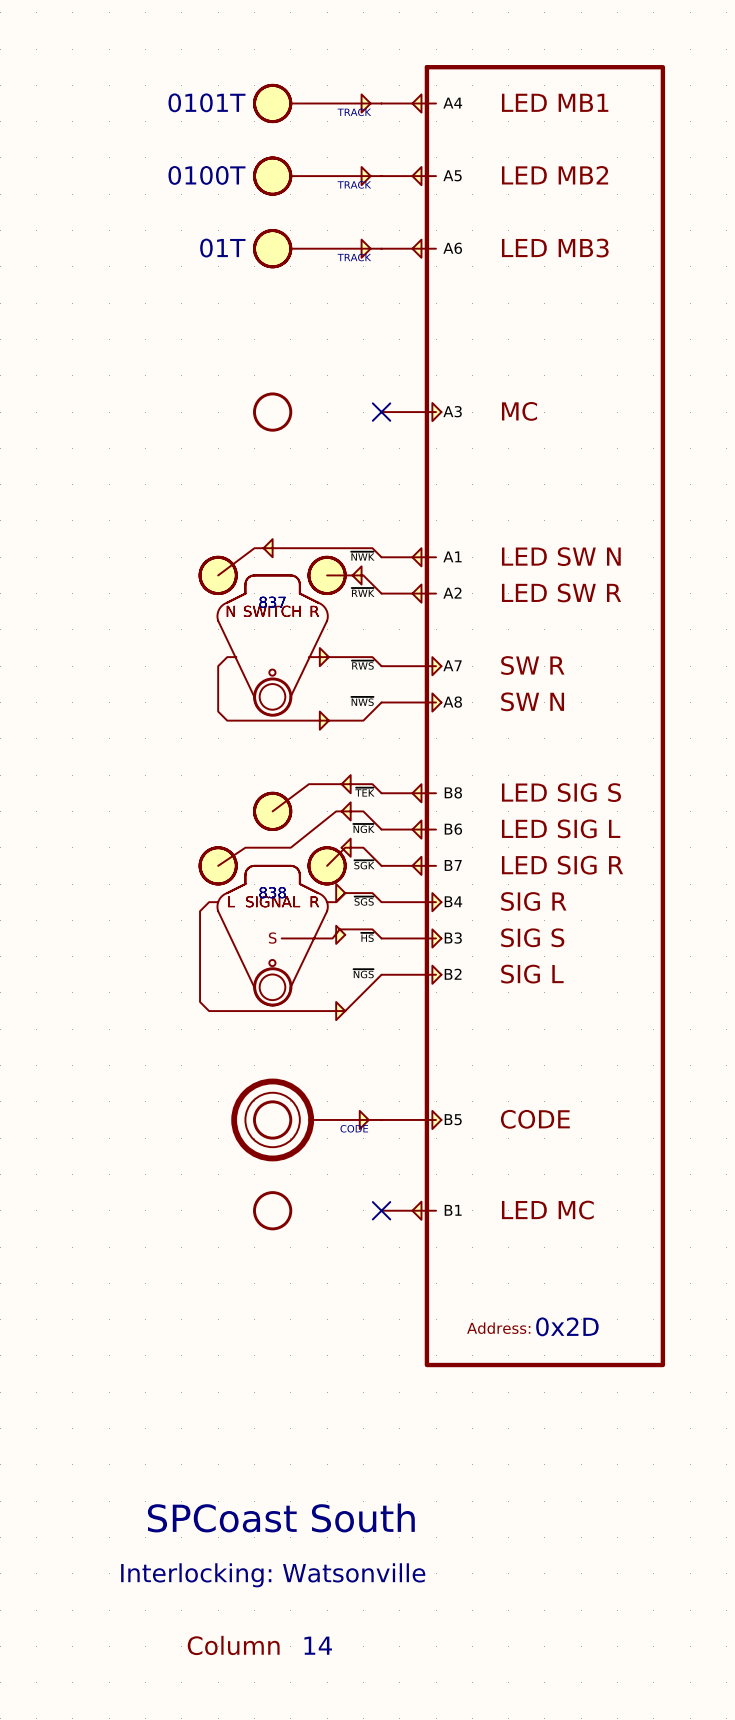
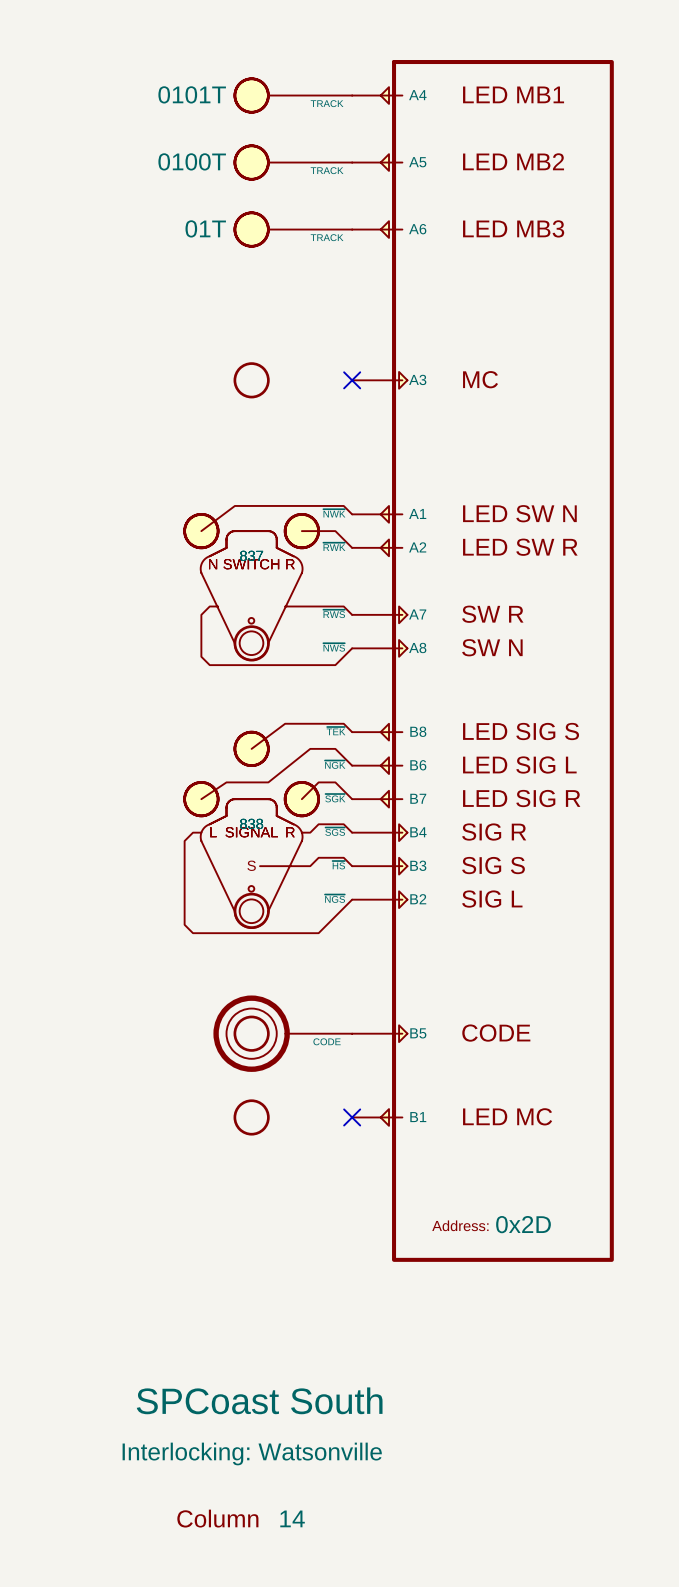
part symbol: [253, 83, 382, 124] -> [233, 77, 353, 114]
part symbol: [253, 156, 382, 196] -> [233, 144, 353, 181]
part symbol: [253, 229, 382, 269] -> [233, 211, 353, 248]
part symbol: [198, 539, 382, 603] -> [183, 505, 353, 557]
part symbol: [217, 575, 382, 730] -> [200, 531, 353, 666]
part symbol: [198, 775, 382, 894] -> [183, 723, 353, 825]
part symbol: [200, 865, 382, 1021] -> [184, 799, 353, 934]
part symbol: [231, 1078, 382, 1162] -> [213, 995, 353, 1072]

